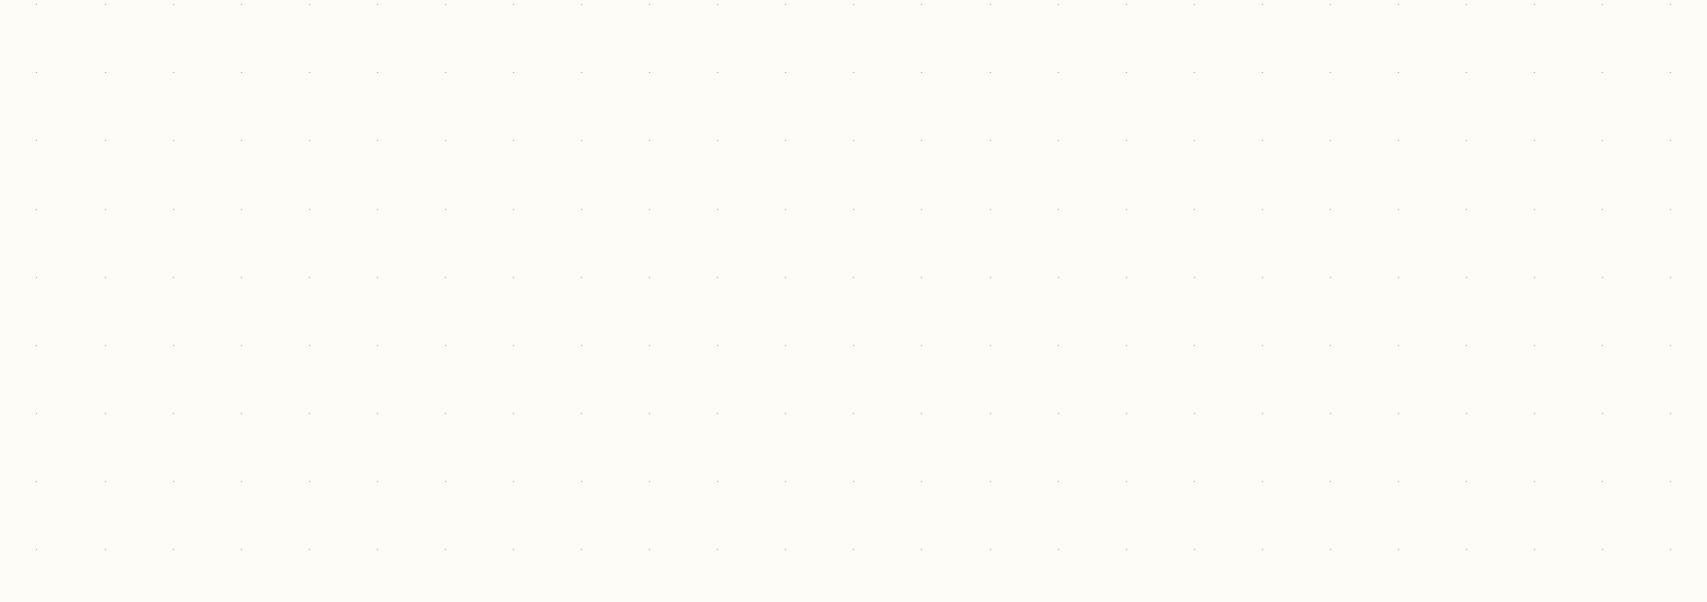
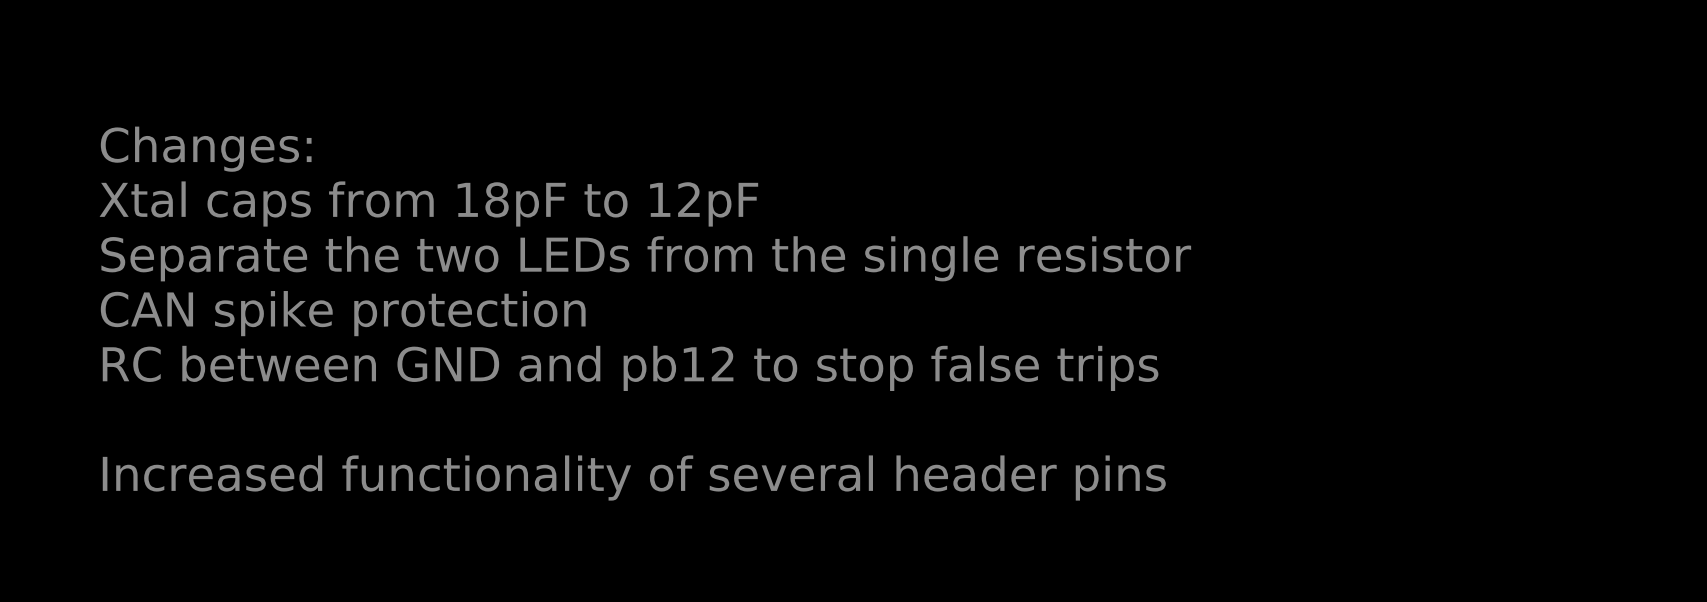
text: none -> Changes: (206, 149)
text: none -> Xtal caps from 18pF to 12pF (428, 203)
text: none -> Separate the two LEDs from the single resistor (646, 258)
text: none -> CAN spike protection (343, 313)
text: none -> RC between GND and pb12 to stop false trips (630, 368)
text: none -> Increased functionality of several header pins (634, 478)

